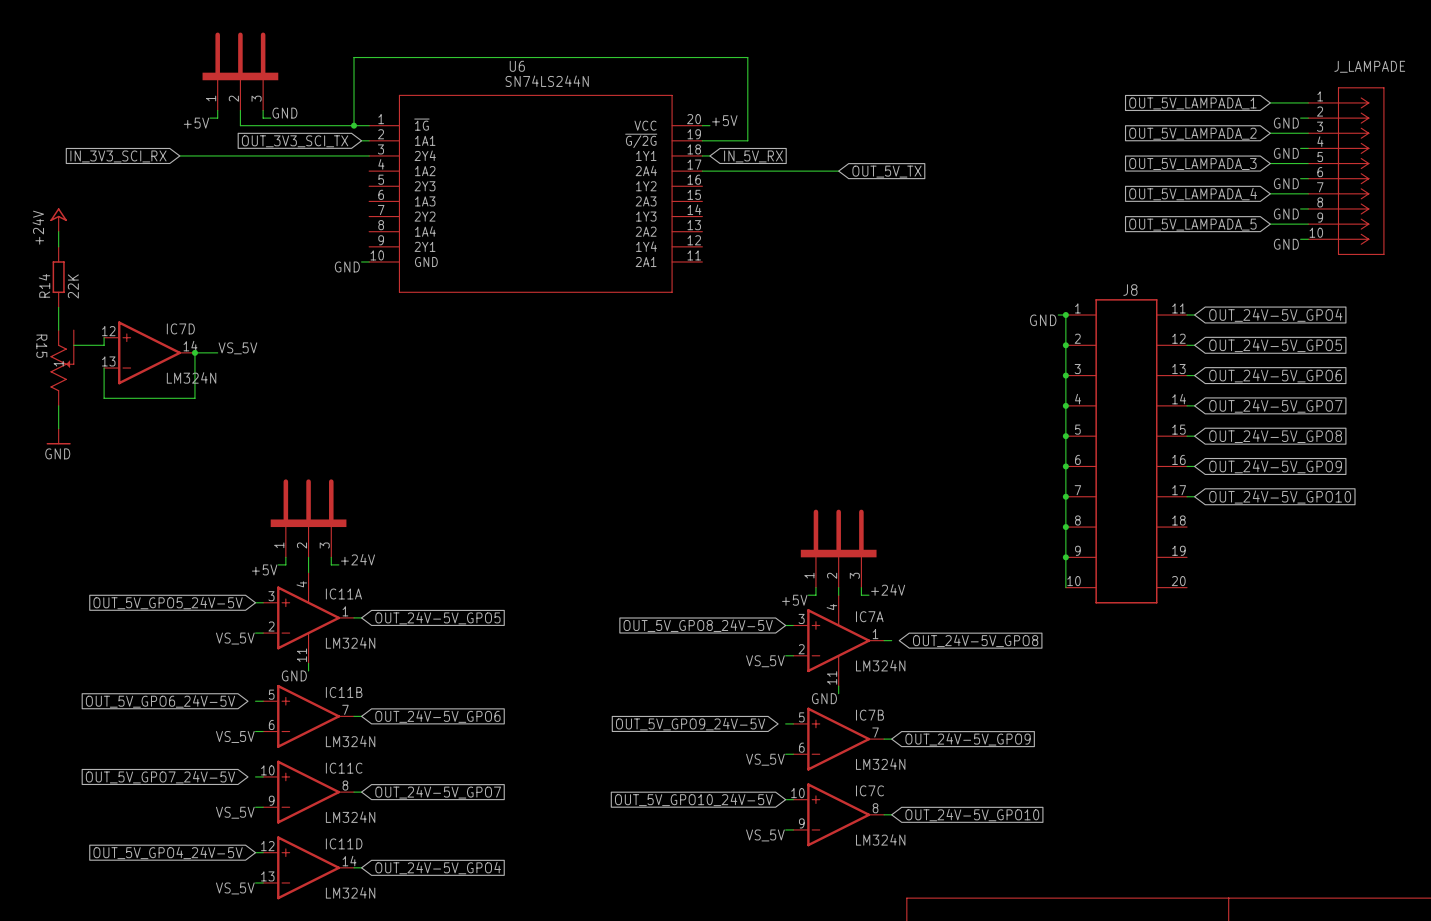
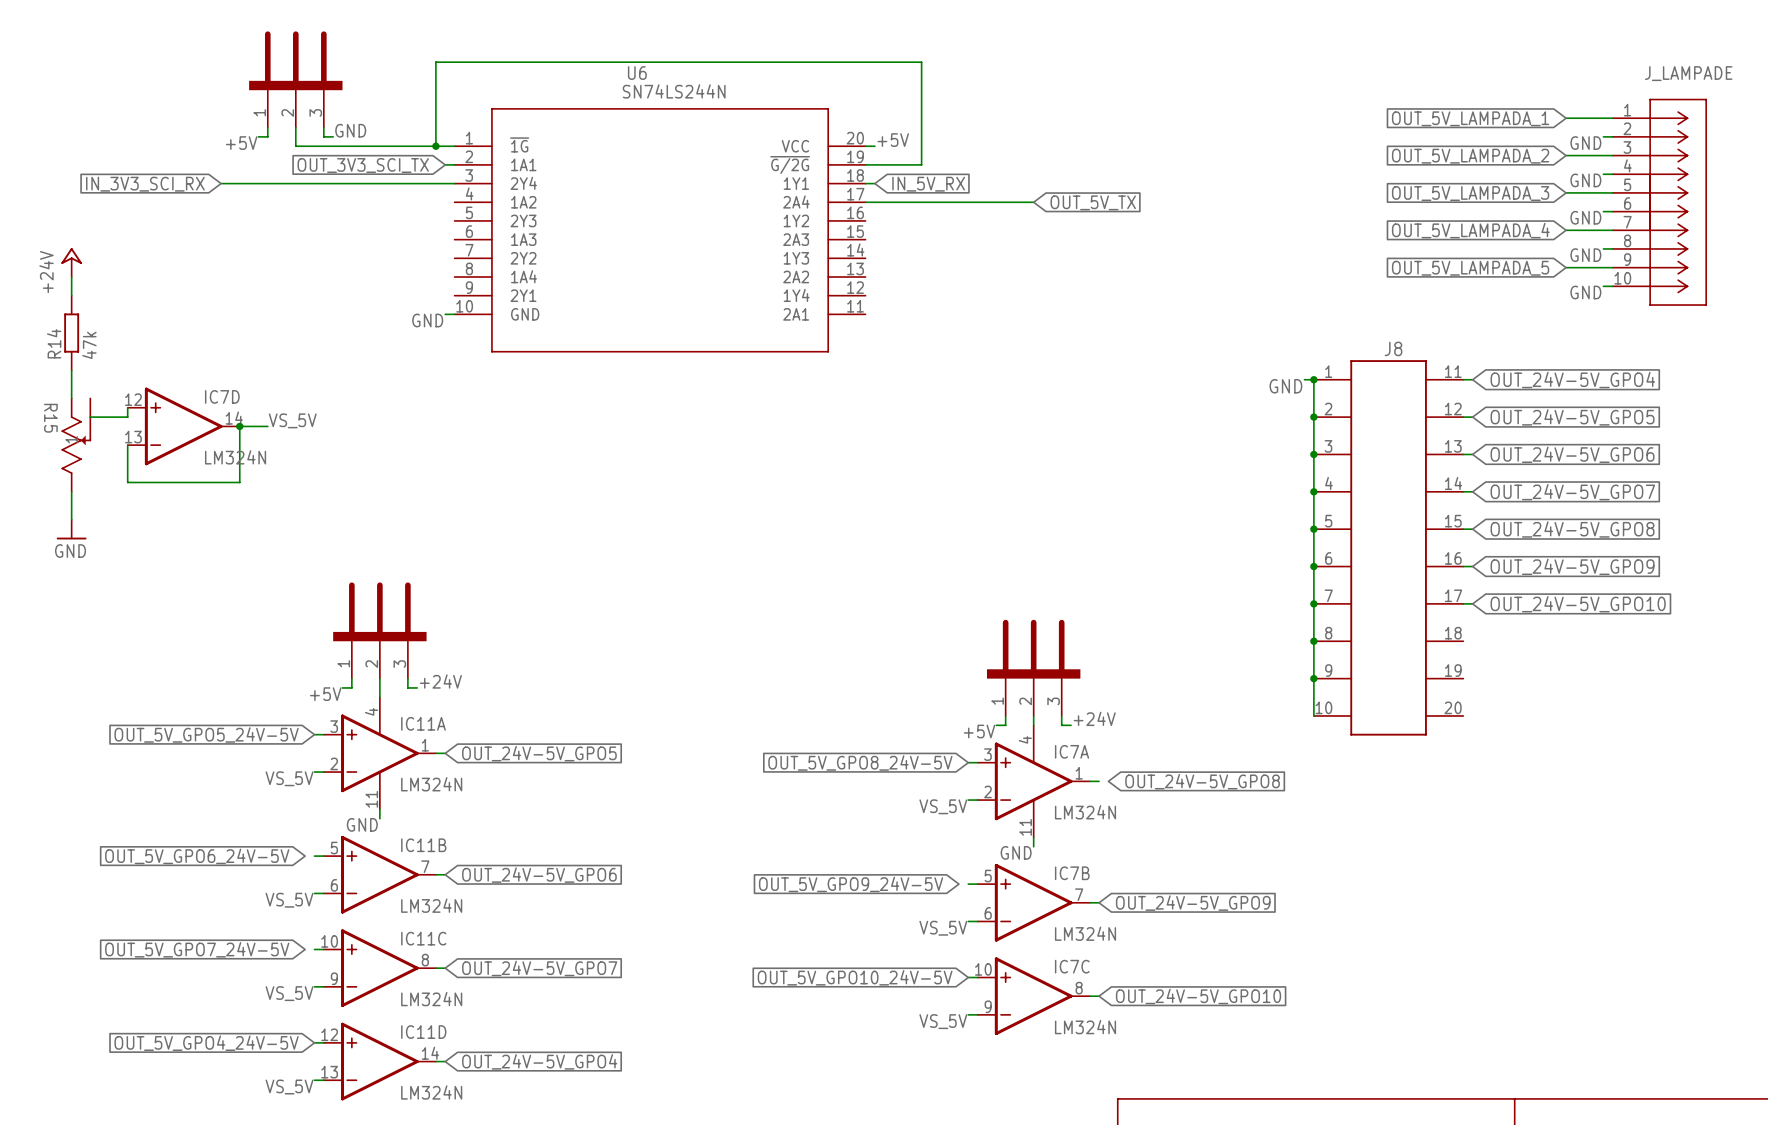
R14 value: 22K (73, 286) -> 47k (89, 345)

